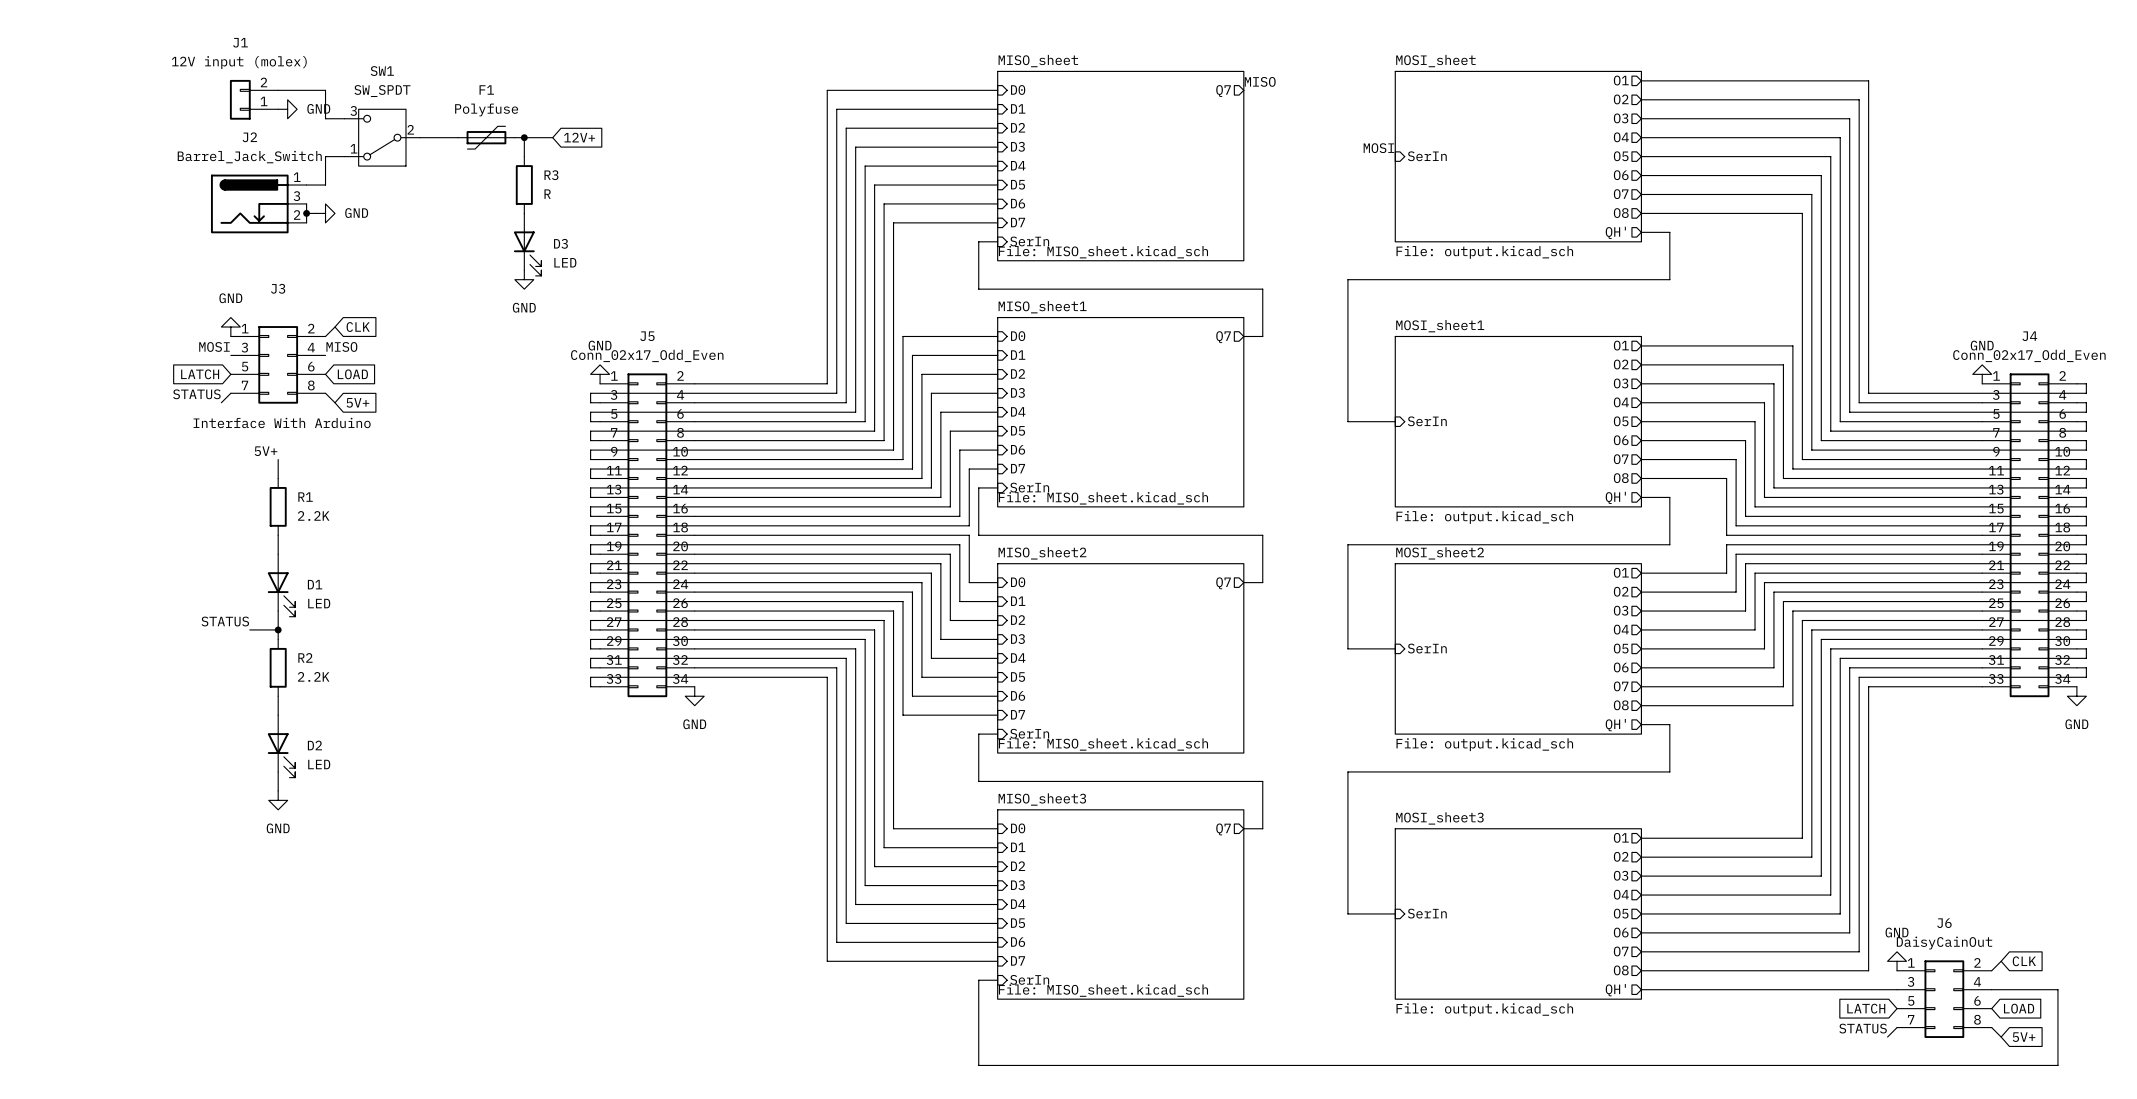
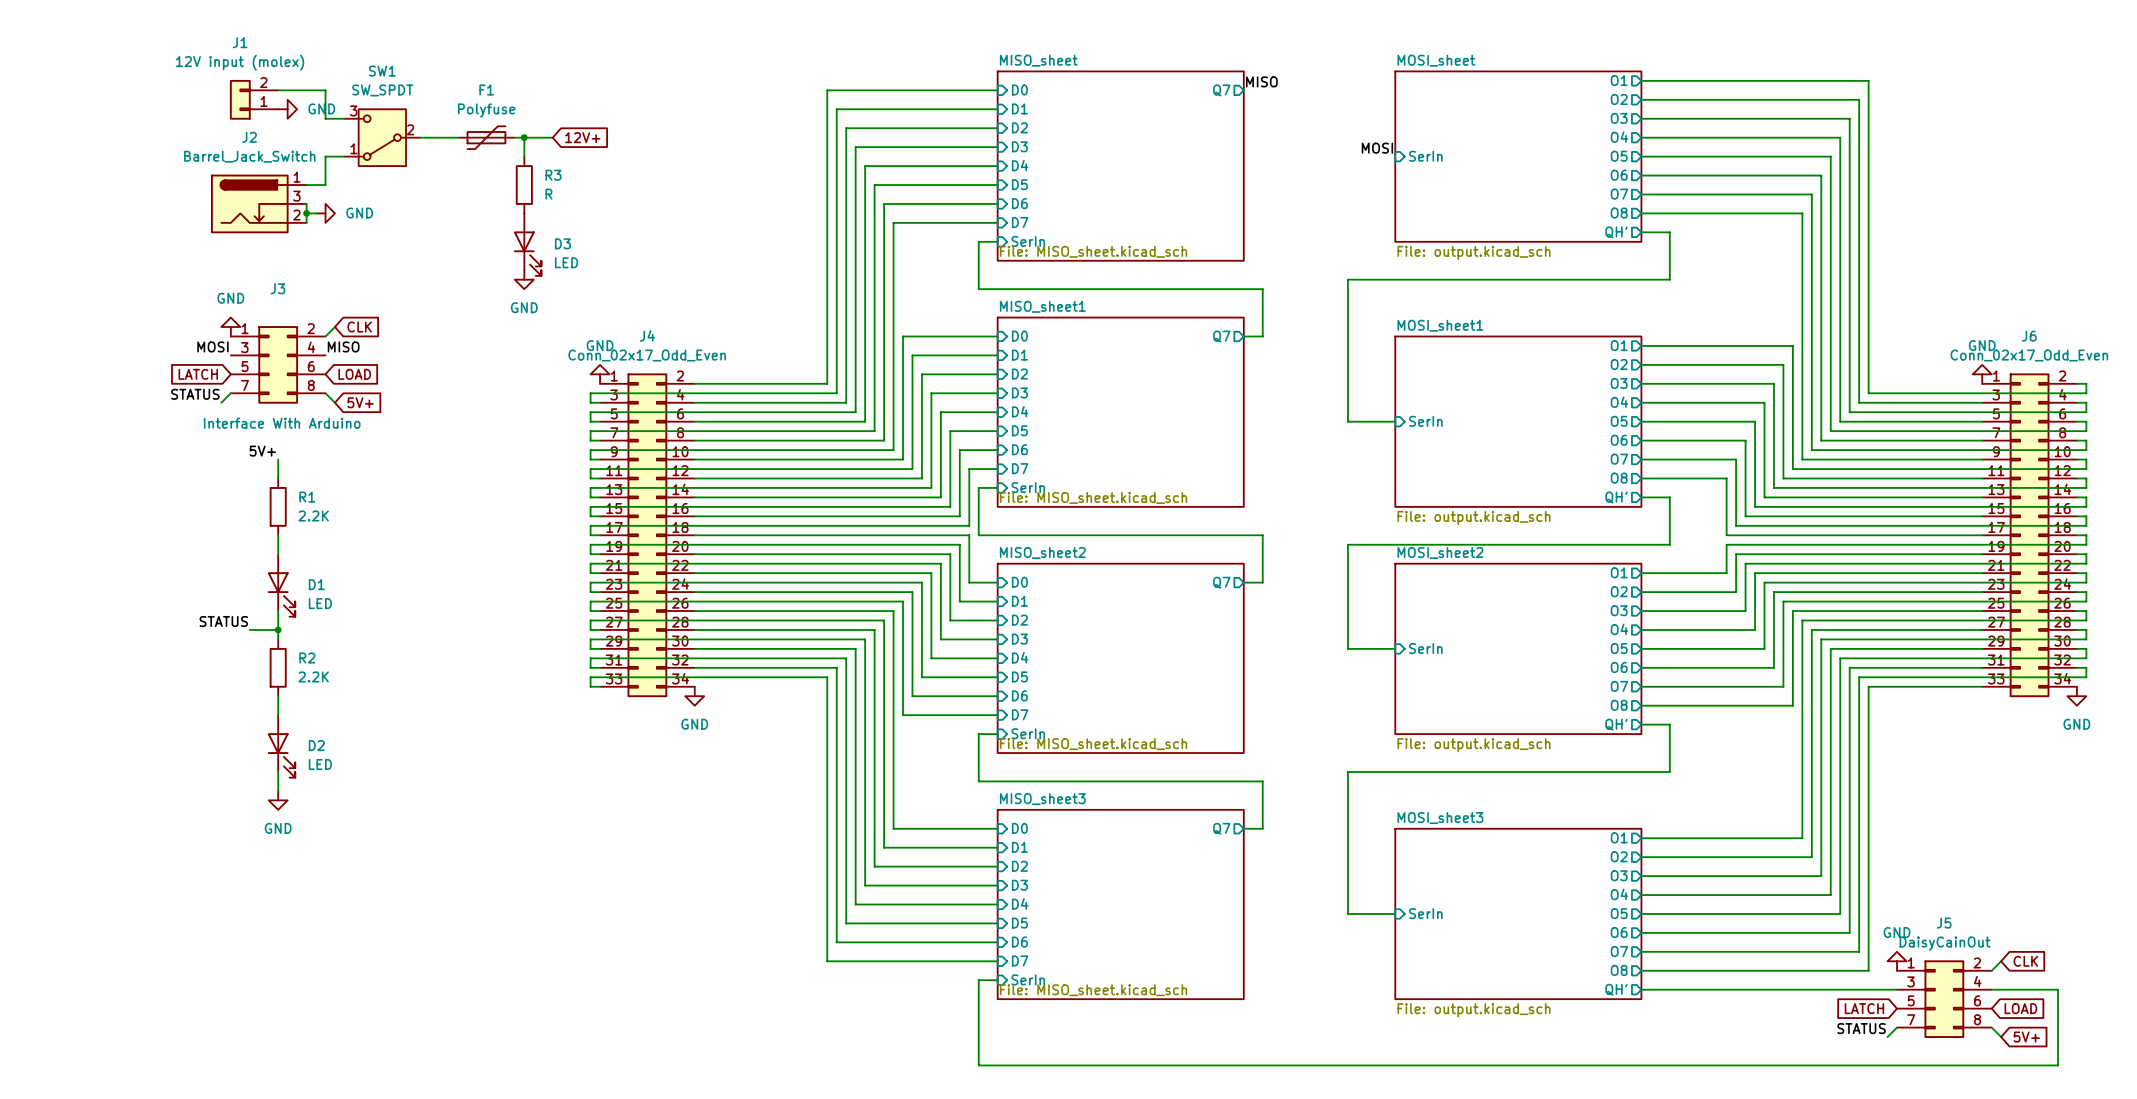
J5 name: J5 (647, 336) -> J4 (647, 335)
J4 name: J4 (2029, 336) -> J6 (2029, 336)
J6 name: J6 (1944, 923) -> J5 (1944, 923)

